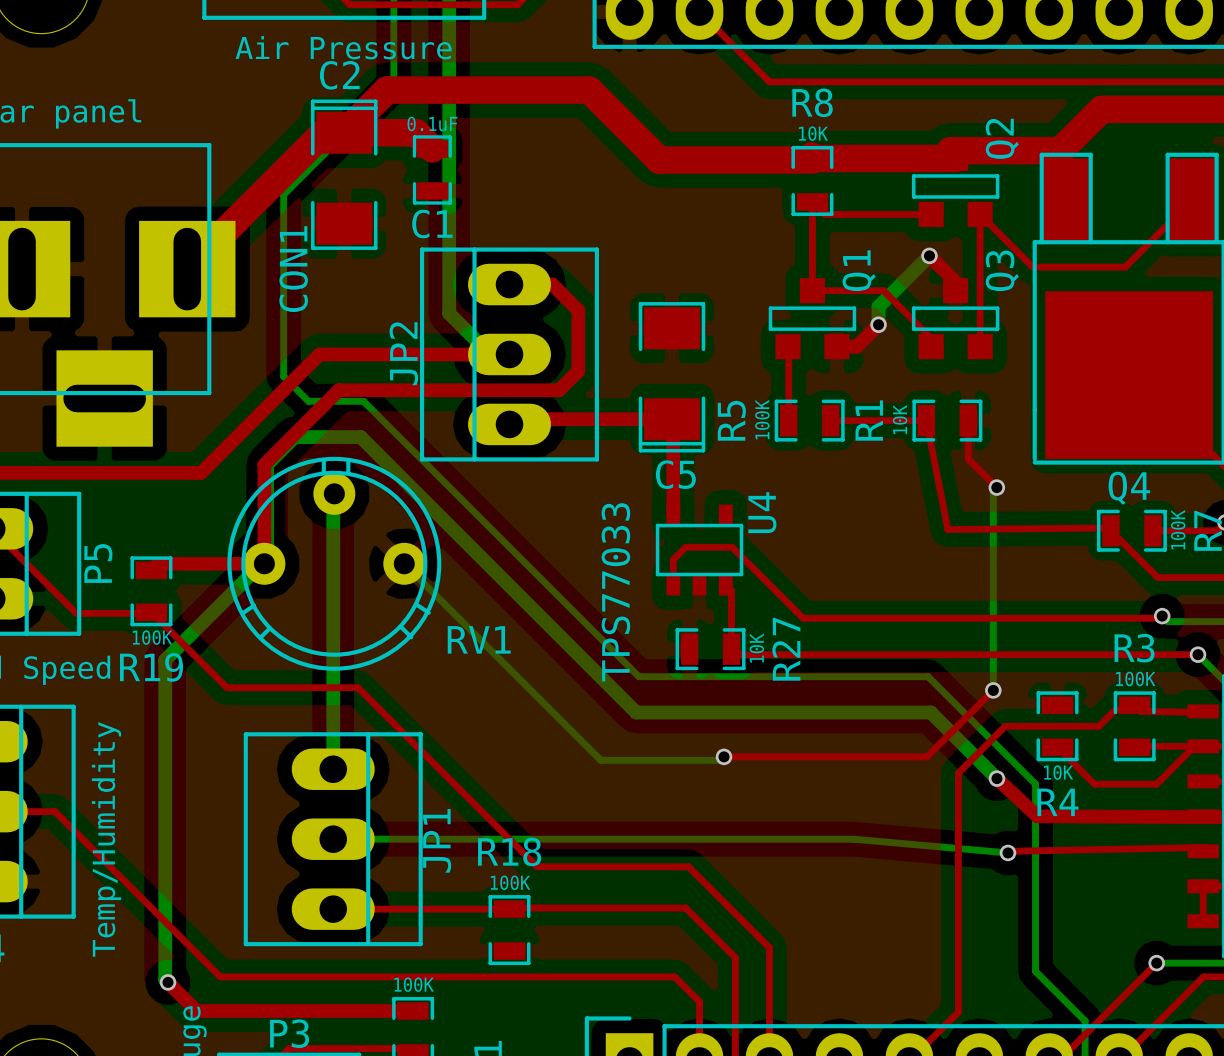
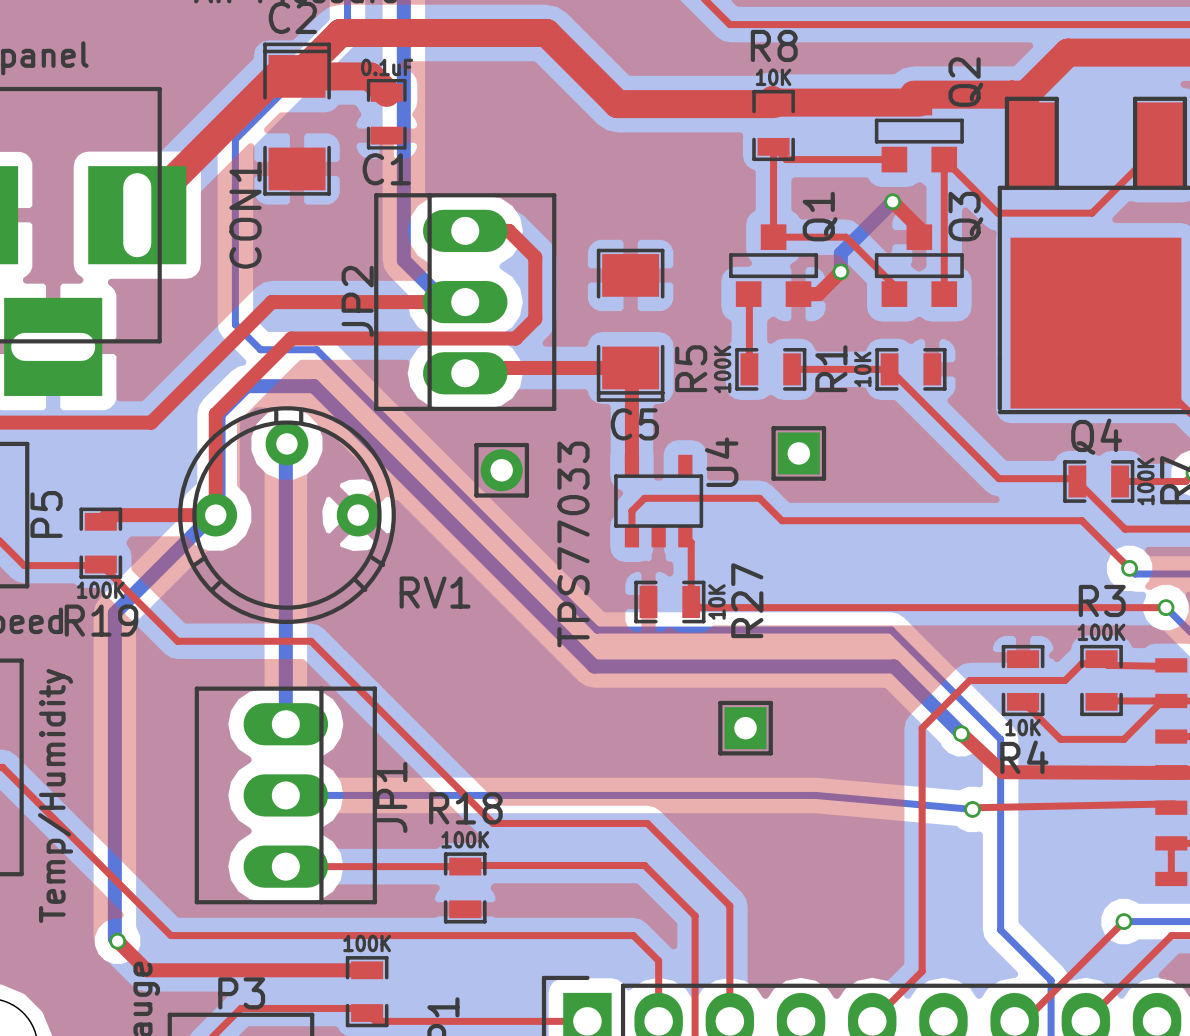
top track: (926, 420) (947, 529) (1108, 527) -> (889, 369) (998, 478) (1074, 478)
top track: (968, 420) (968, 459) (996, 487) -> none
bottom track: (996, 487) (993, 491) (993, 690) -> none
via: (996, 487) -> none
part: none -> (798, 453)
part: none -> (501, 470)
top track: (732, 547) (803, 618) (1164, 618) (1162, 616) -> (691, 498) (759, 498) (781, 520) (1081, 520) (1129, 568)
bottom track: (404, 563) (600, 760) (720, 760) (724, 756) -> none
top track: (993, 690) (926, 756) (724, 756) -> none
via: (993, 690) -> none
via: (724, 756) -> none
part: none -> (745, 728)

